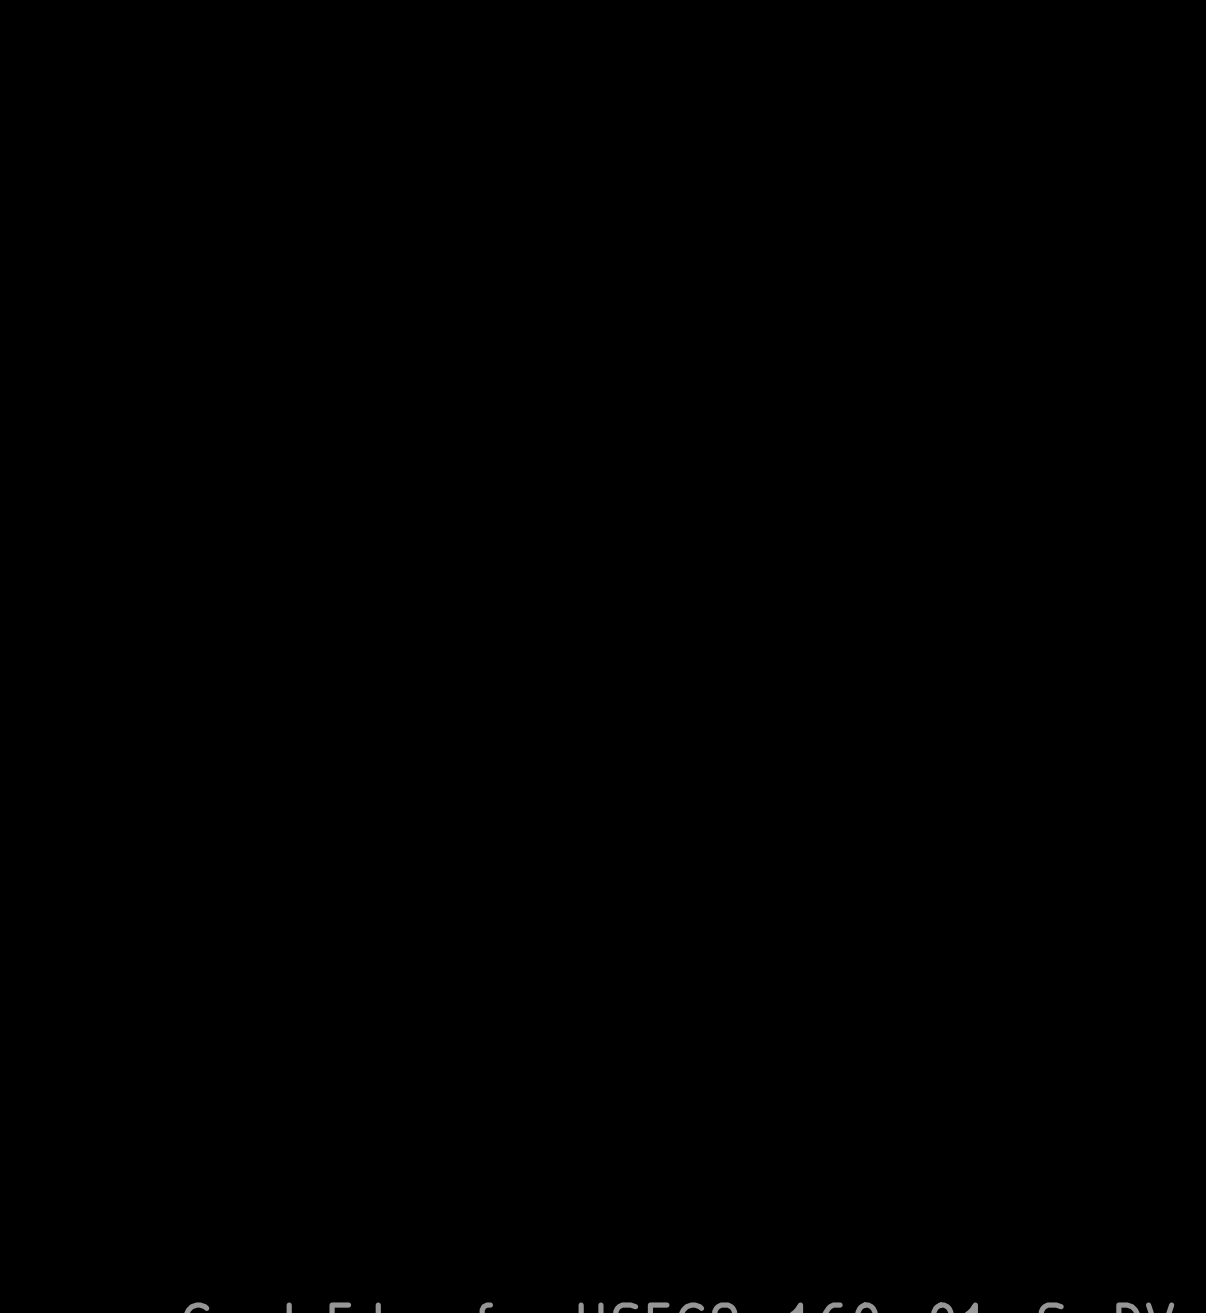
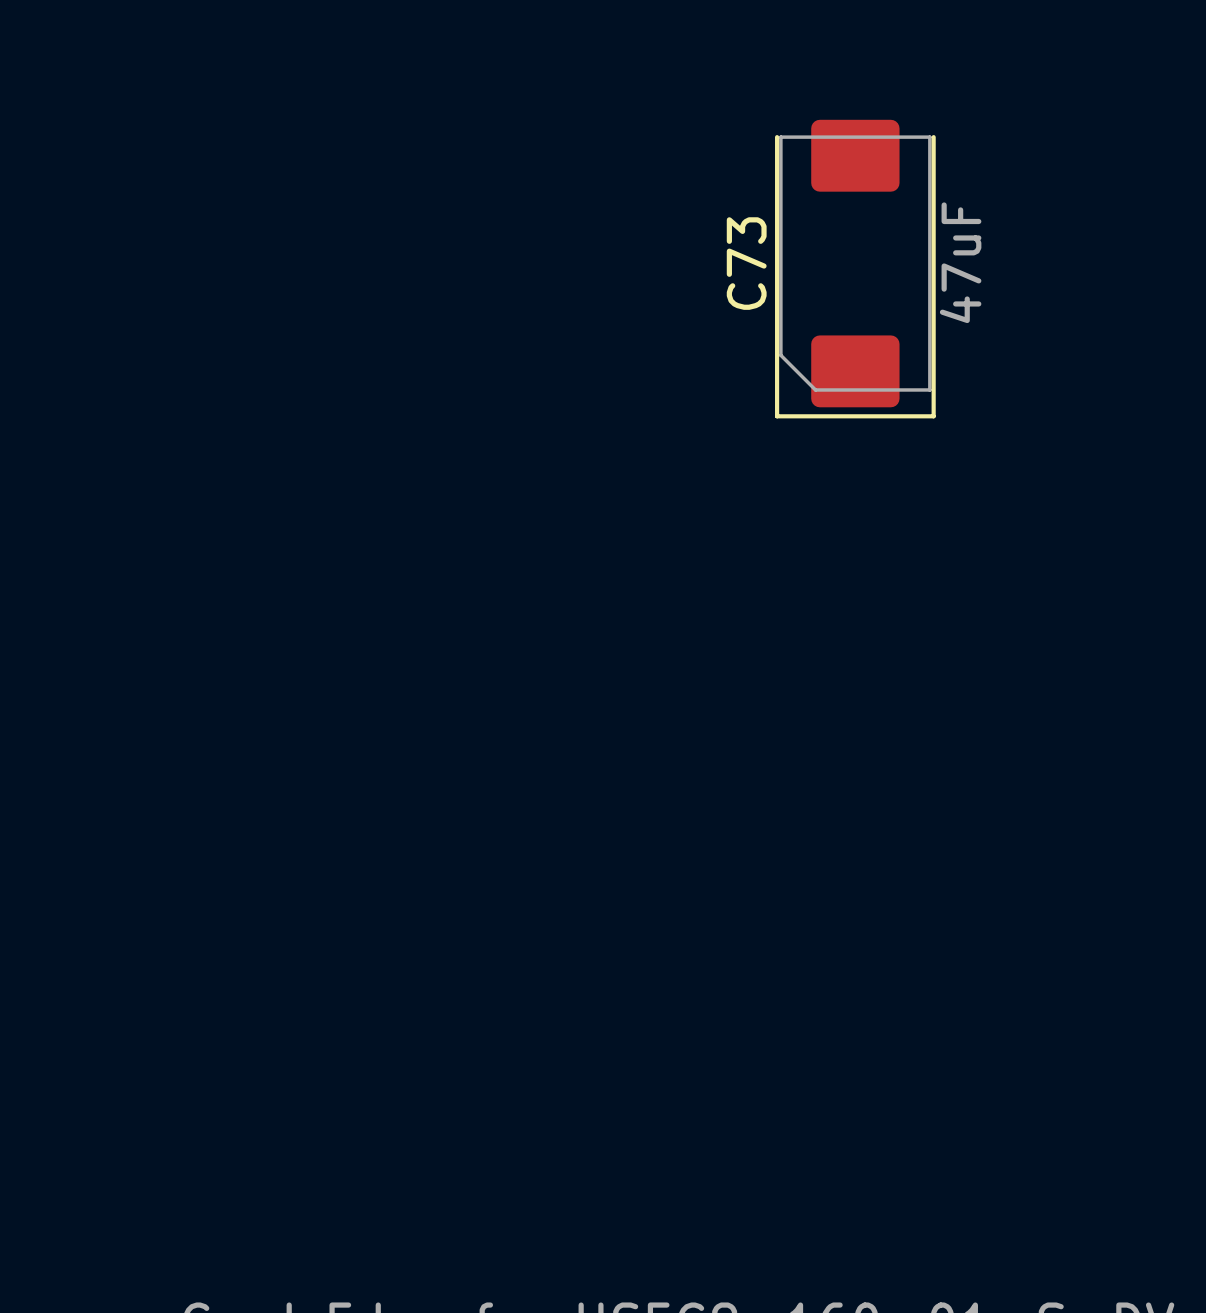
C73: none -> 47uF (855, 269)

